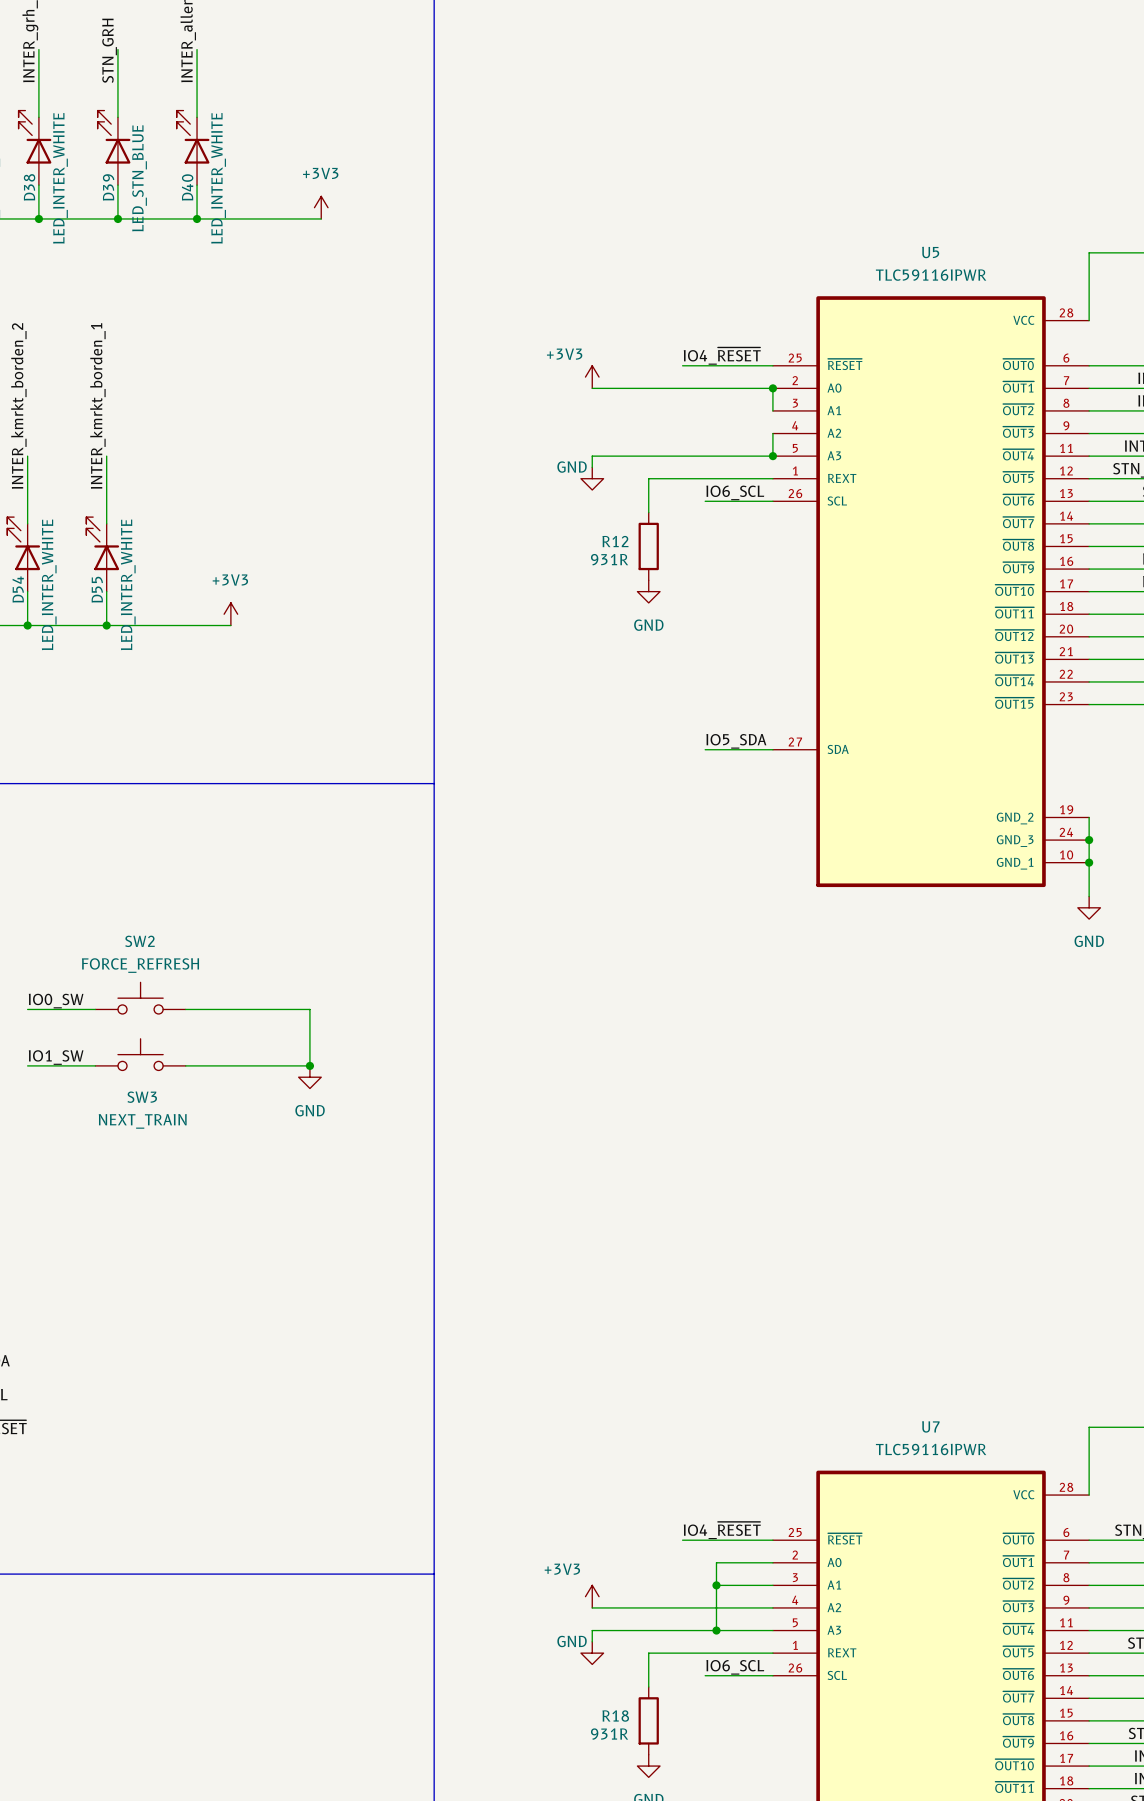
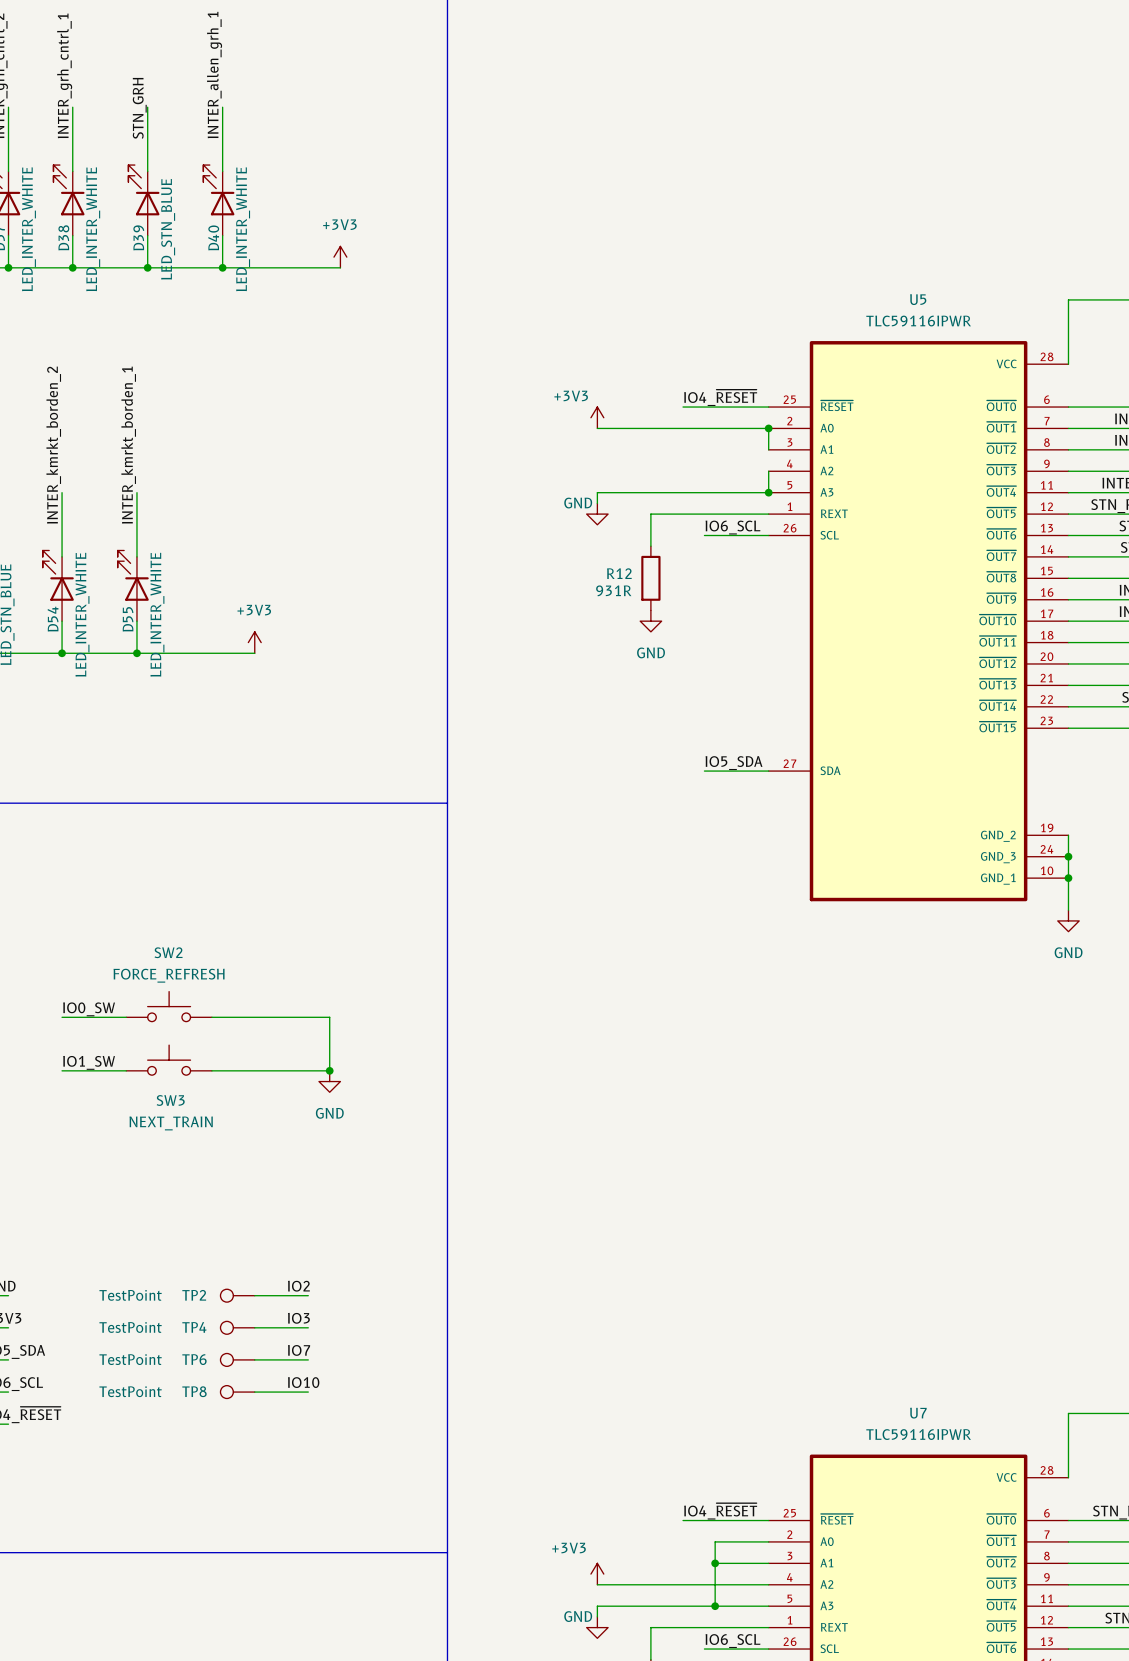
label: none -> IO2 (298, 1286)
TP2: none -> TestPoint (237, 1295)
wire: none -> (254, 1295) (308, 1295)
label: none -> IO3 (298, 1318)
TP4: none -> TestPoint (237, 1327)
wire: none -> (254, 1327) (308, 1327)
label: none -> IO7 (299, 1350)
TP6: none -> TestPoint (237, 1359)
wire: none -> (254, 1359) (308, 1359)
label: none -> IO10 (303, 1382)
TP8: none -> TestPoint (237, 1392)
wire: none -> (254, 1392) (308, 1392)

